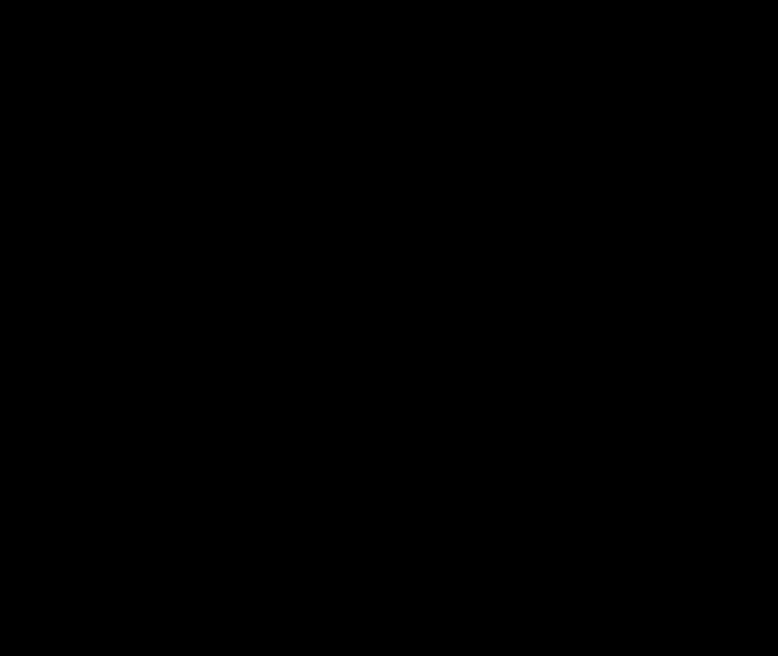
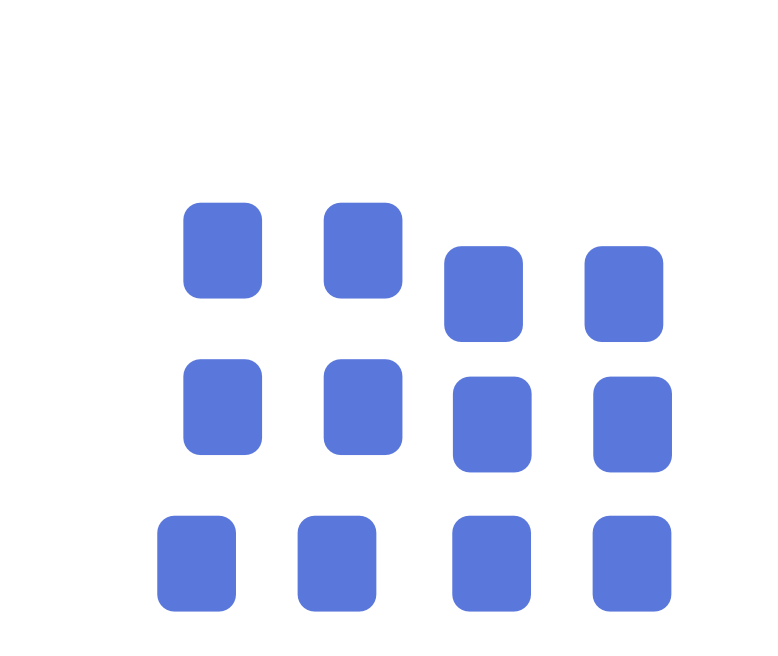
part: none -> (292, 250)
part: none -> (553, 294)
part: none -> (292, 407)
part: none -> (562, 424)
part: none -> (266, 563)
part: none -> (561, 563)

